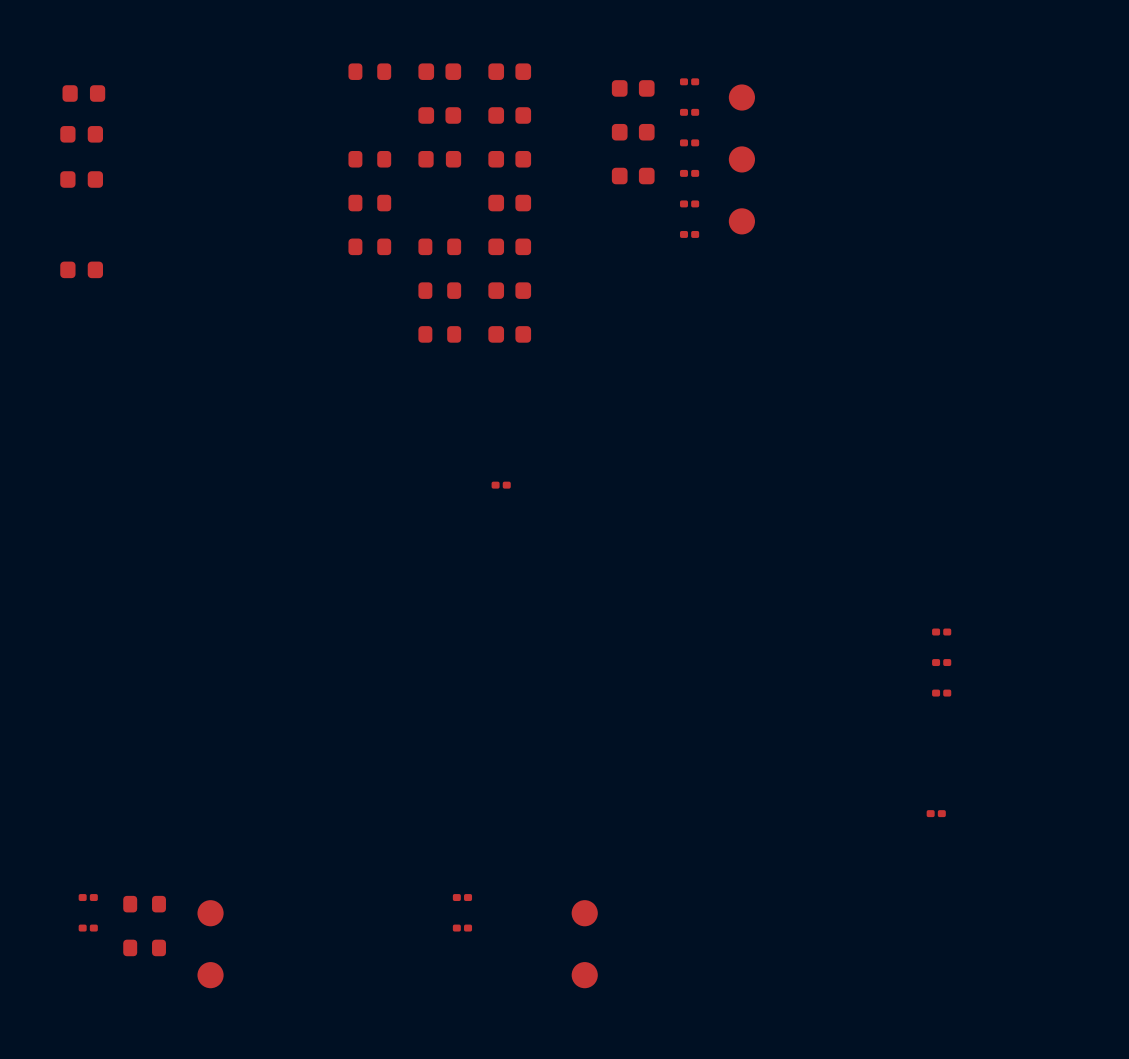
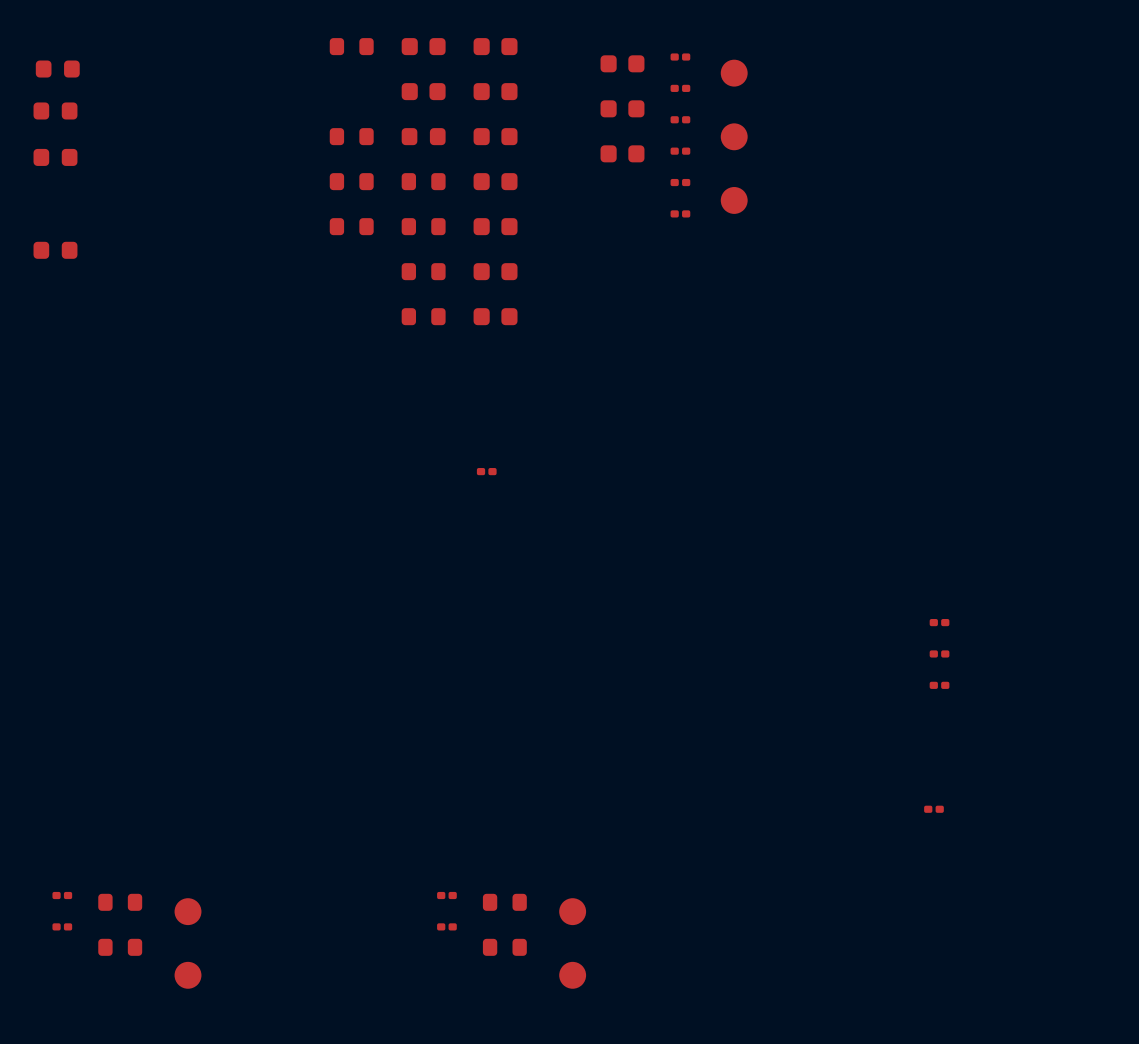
part: none -> (423, 181)
part: none -> (504, 902)
part: none -> (504, 947)

